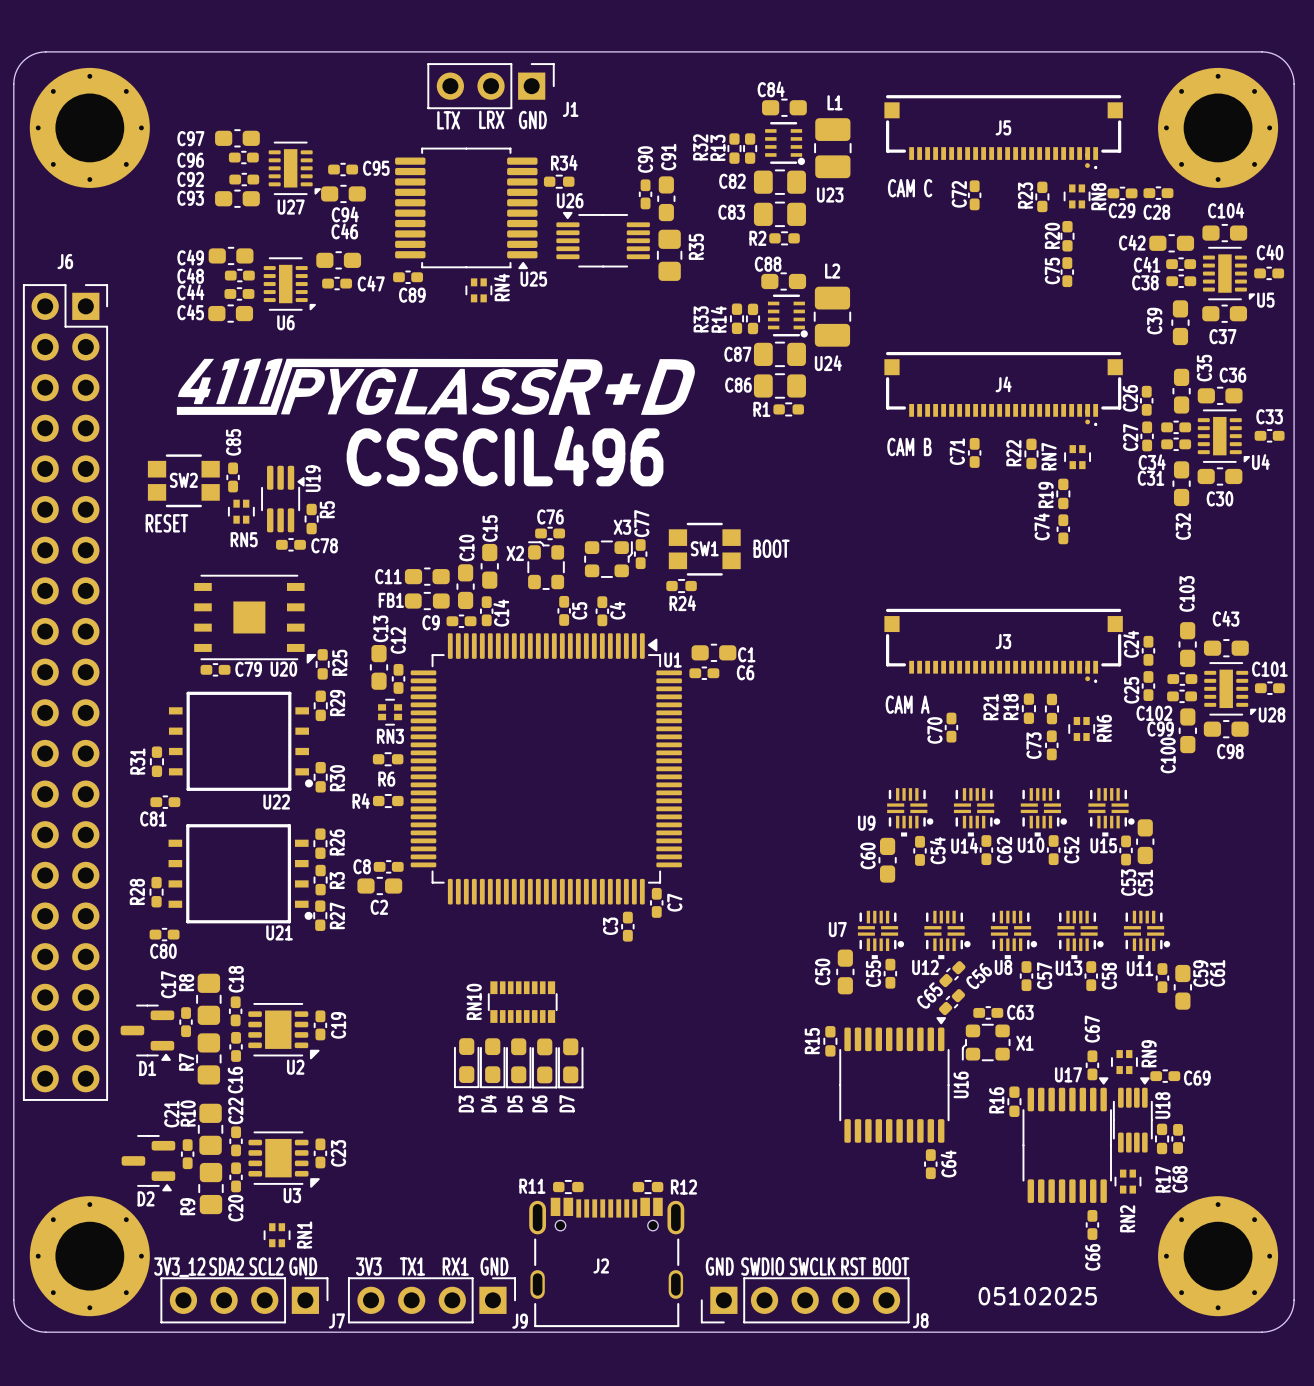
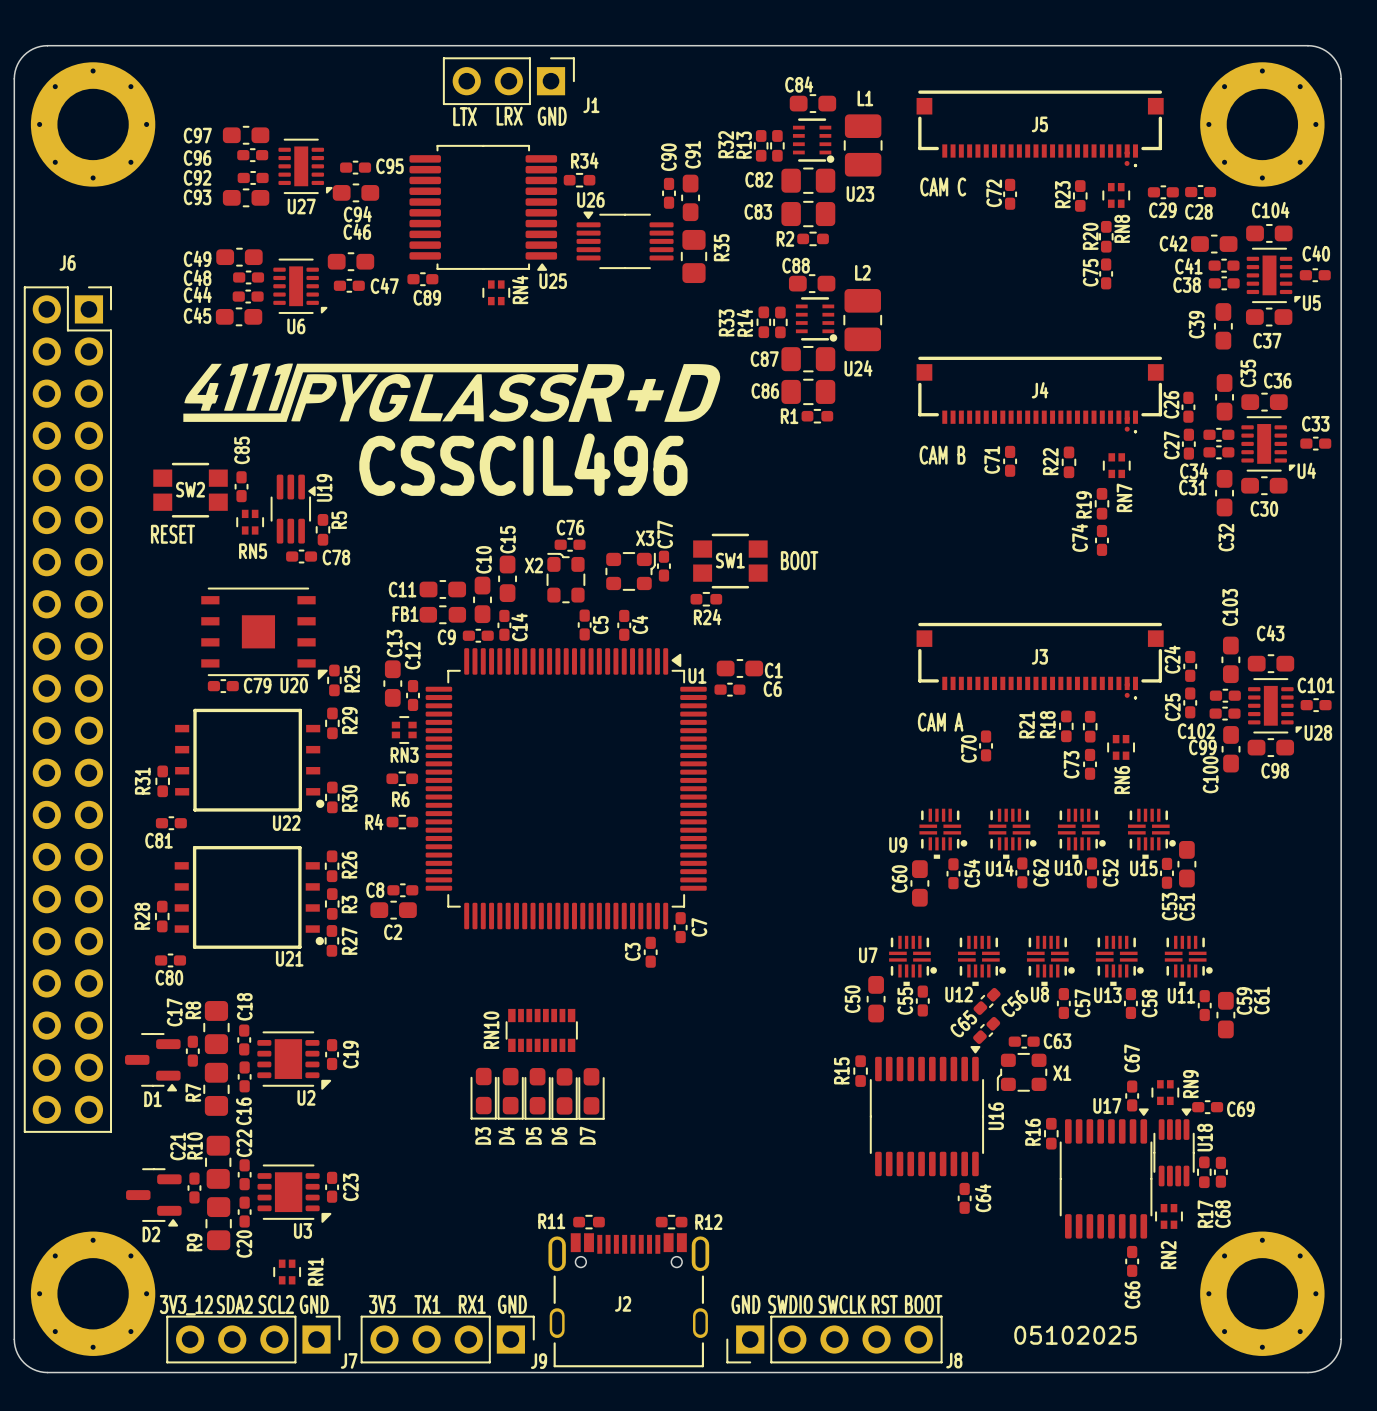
RN8 name position: RN8 (1098, 196) -> RN8 (1122, 228)
RN7 name position: RN7 (1049, 456) -> RN7 (1124, 497)
RN6 name position: RN6 (1104, 728) -> RN6 (1122, 780)

